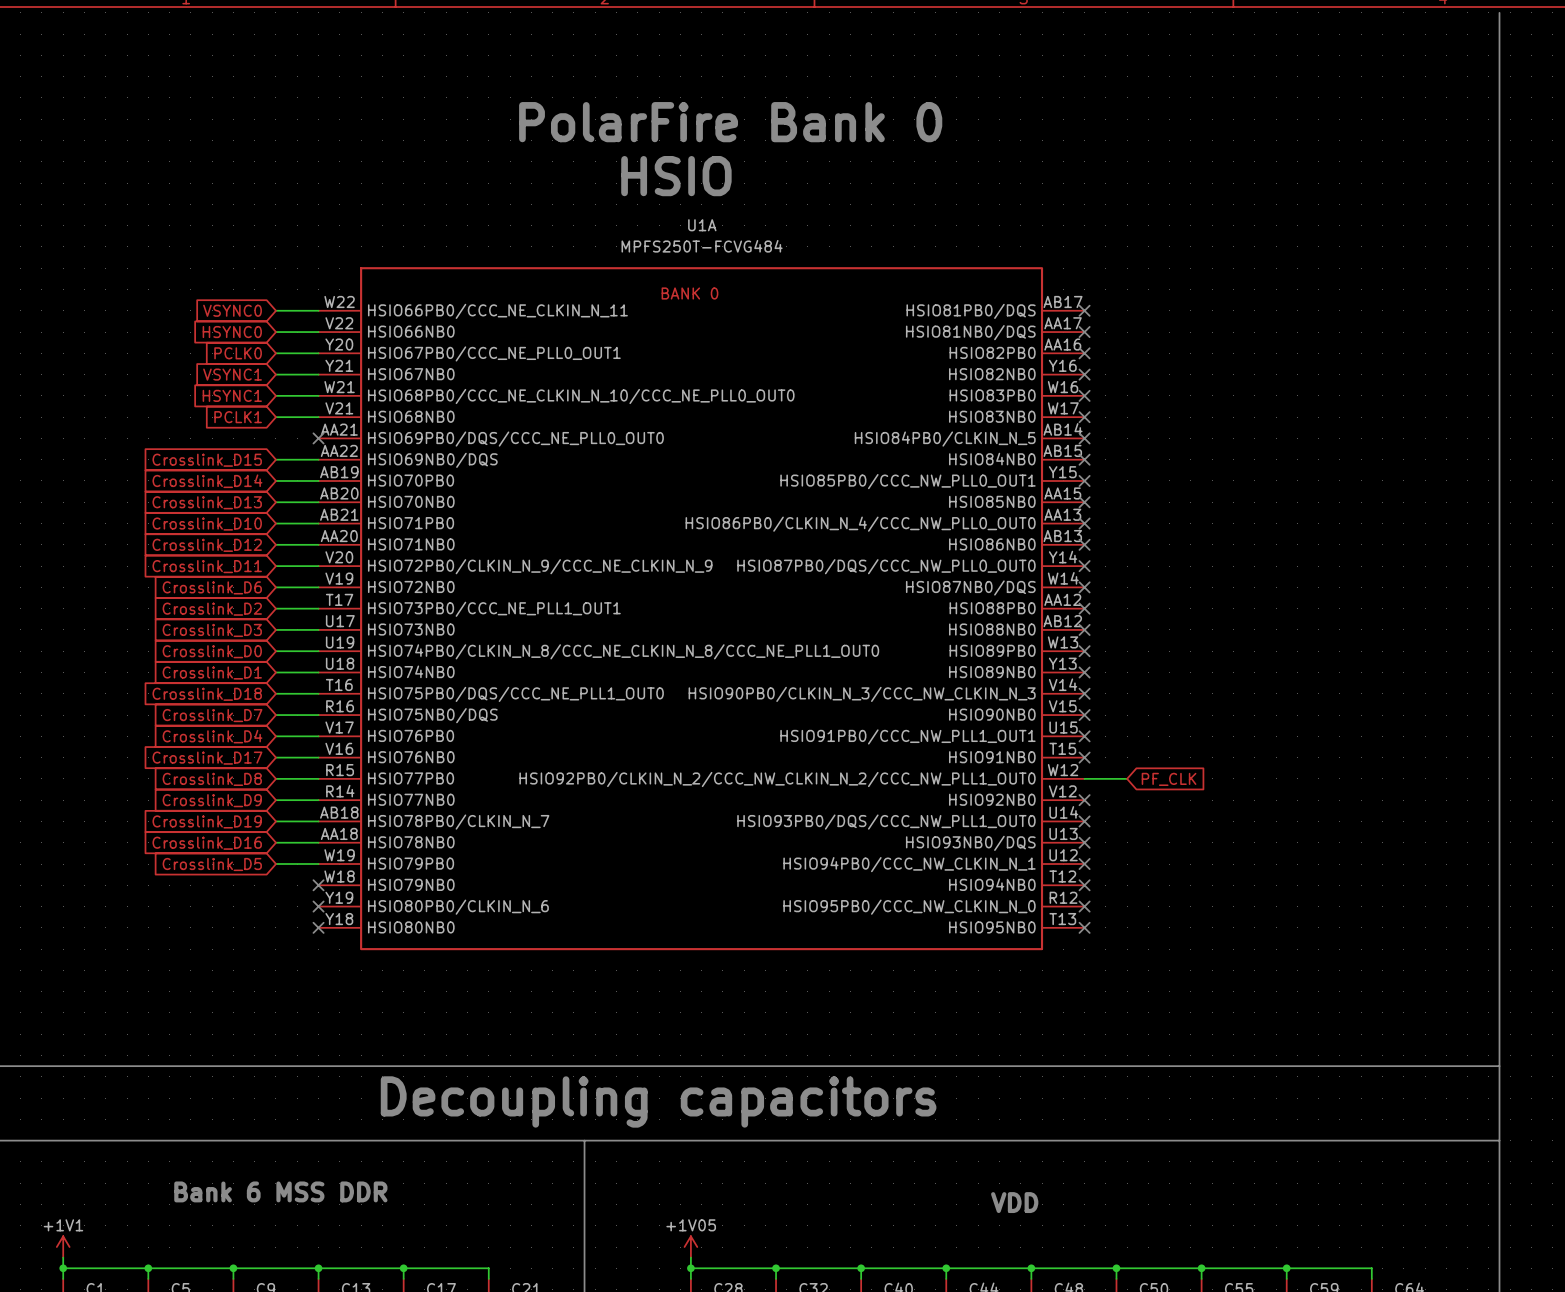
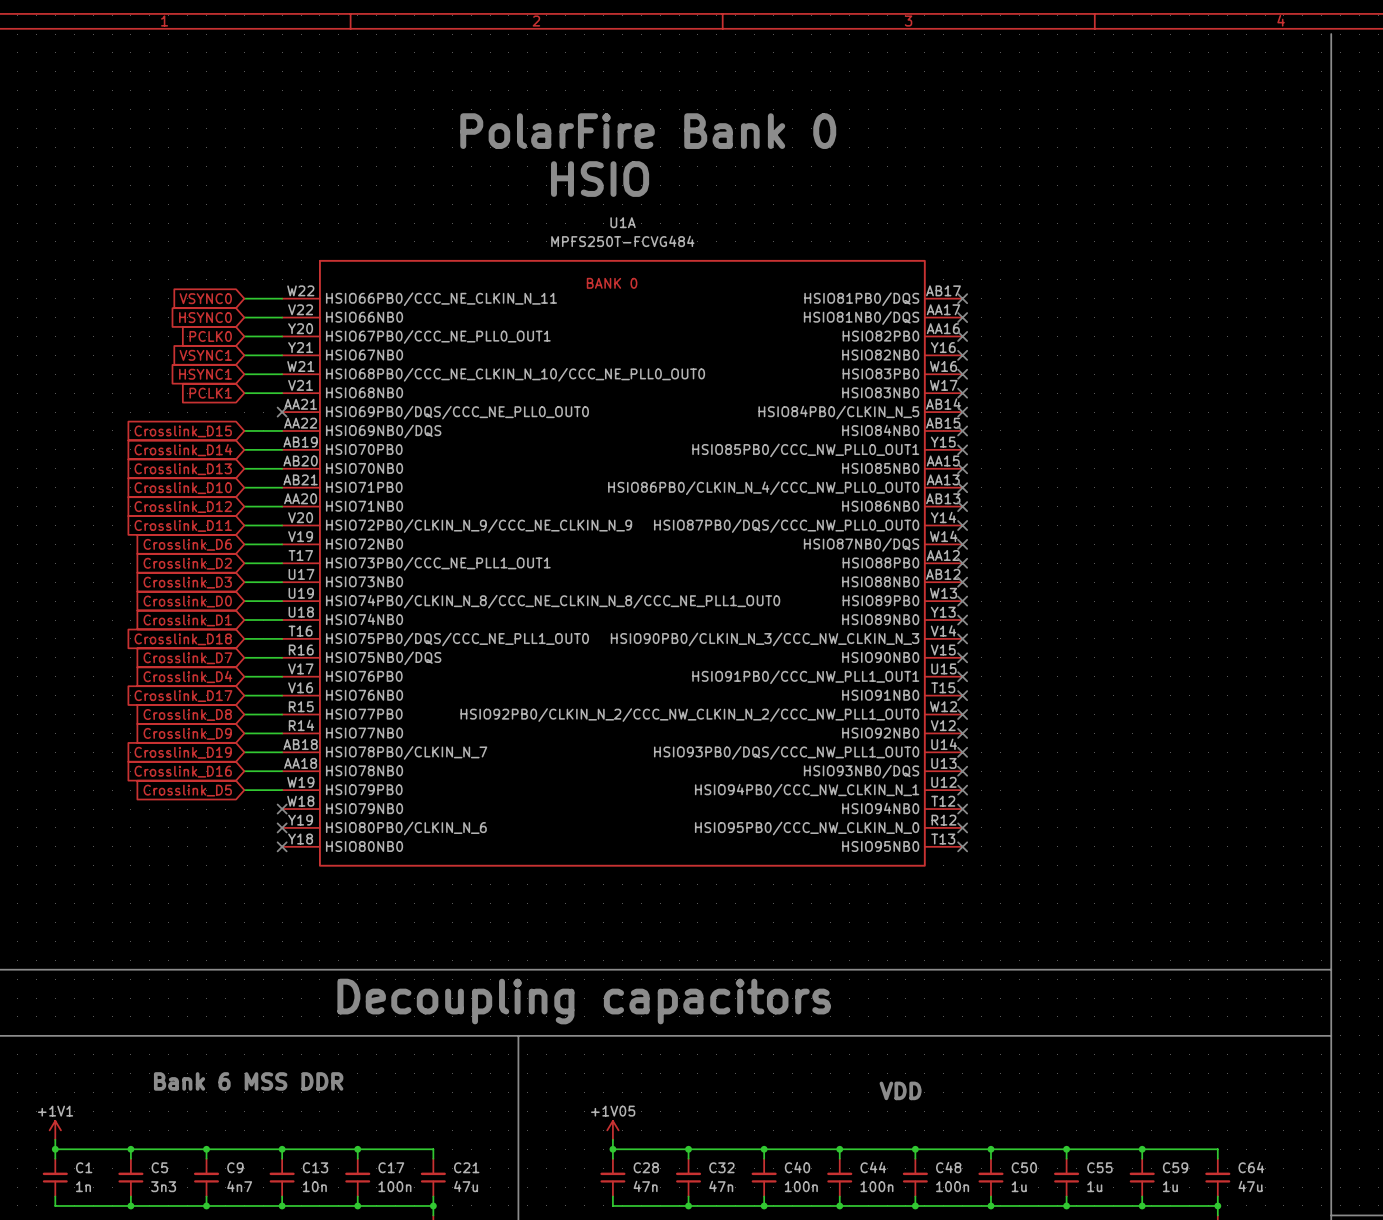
wire: (1084, 778) (1127, 778) -> none
no-connect mark: none -> (962, 714)
global label: PF_CLK (1169, 779) -> none

